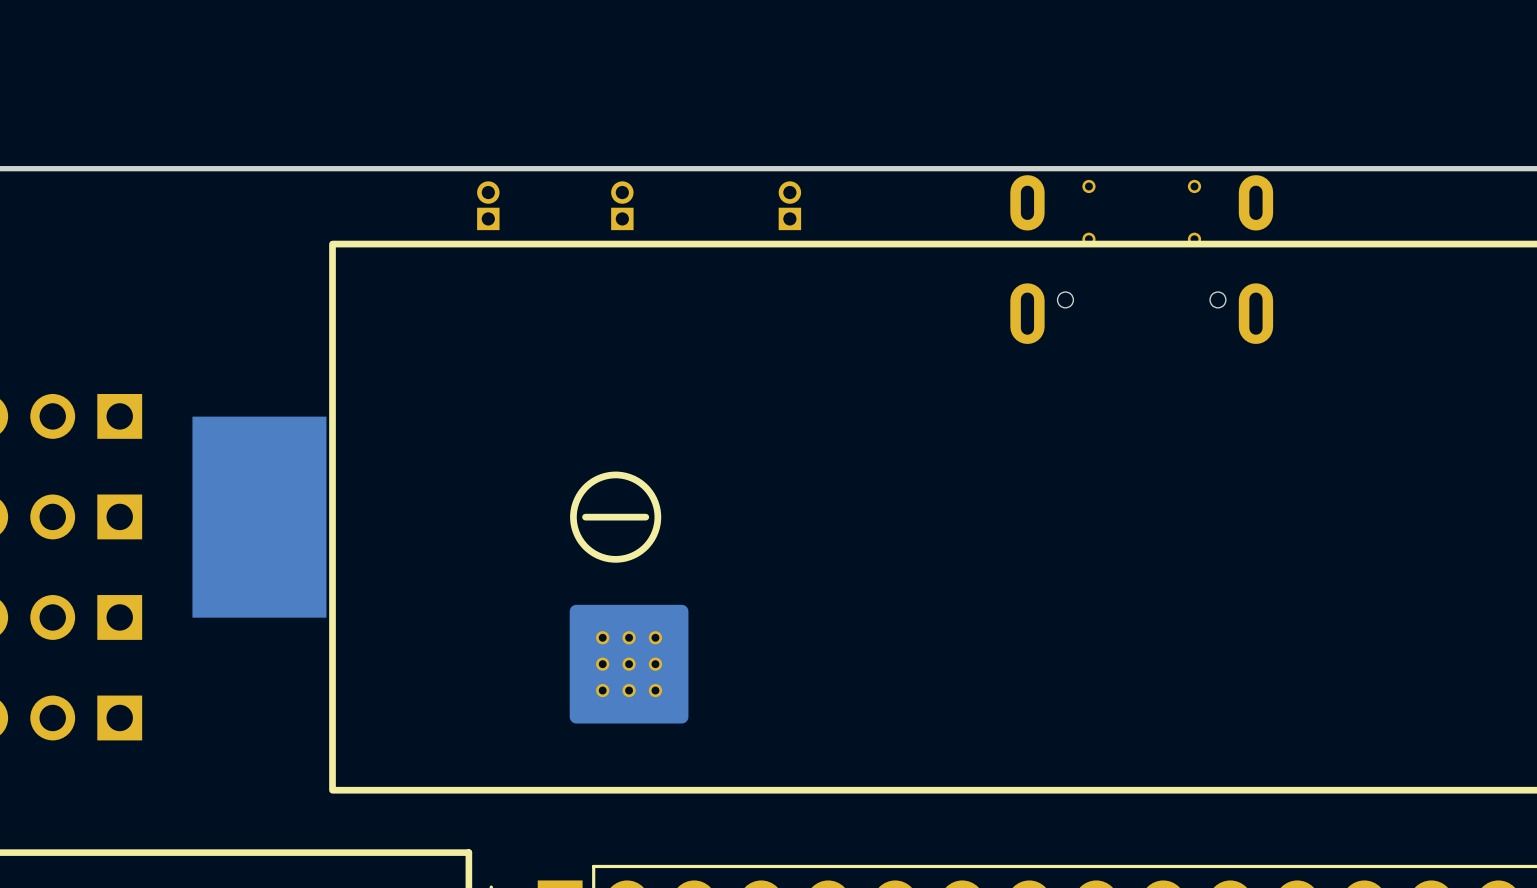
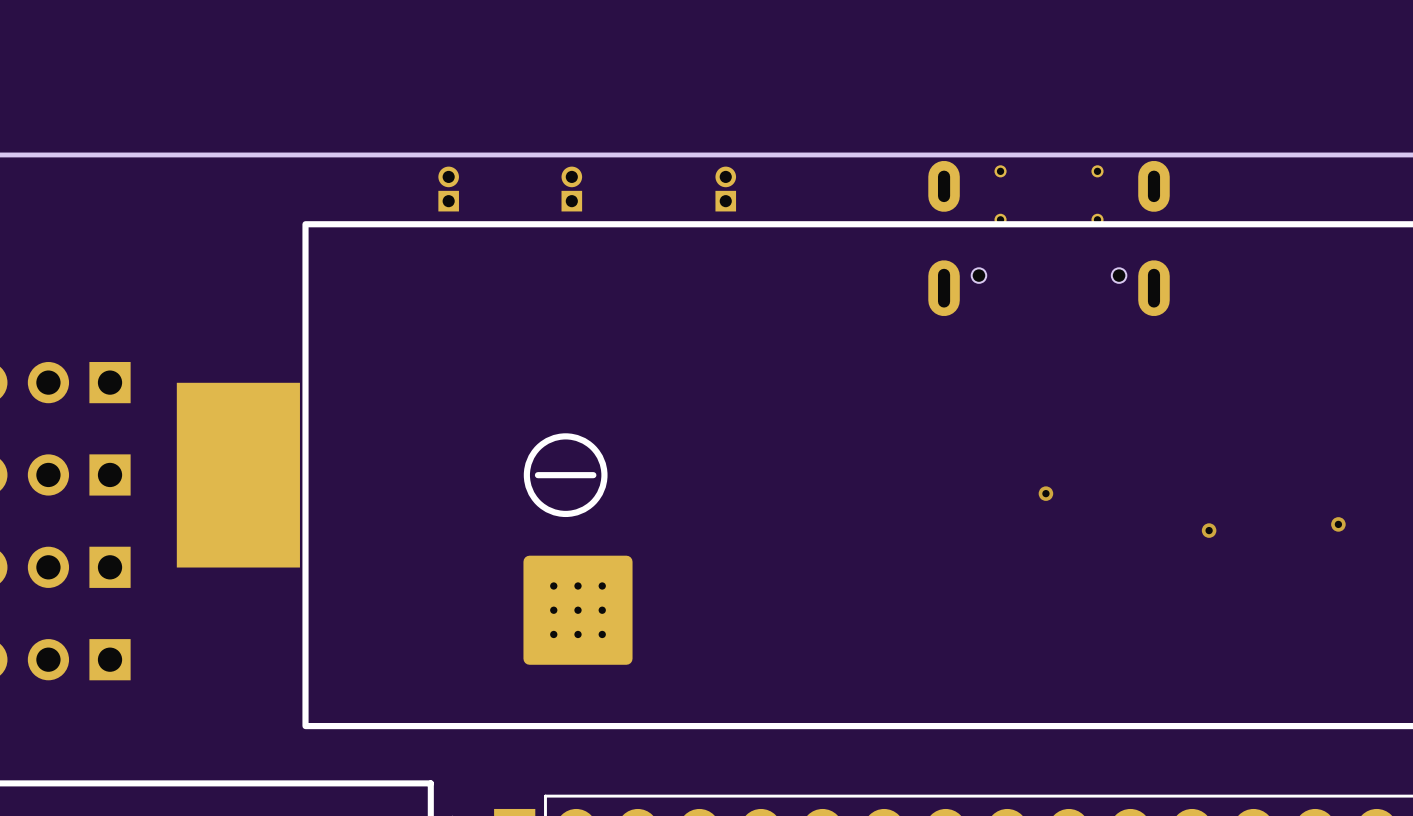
via: none -> (1045, 493)
via: none -> (1338, 524)
via: none -> (1209, 530)

